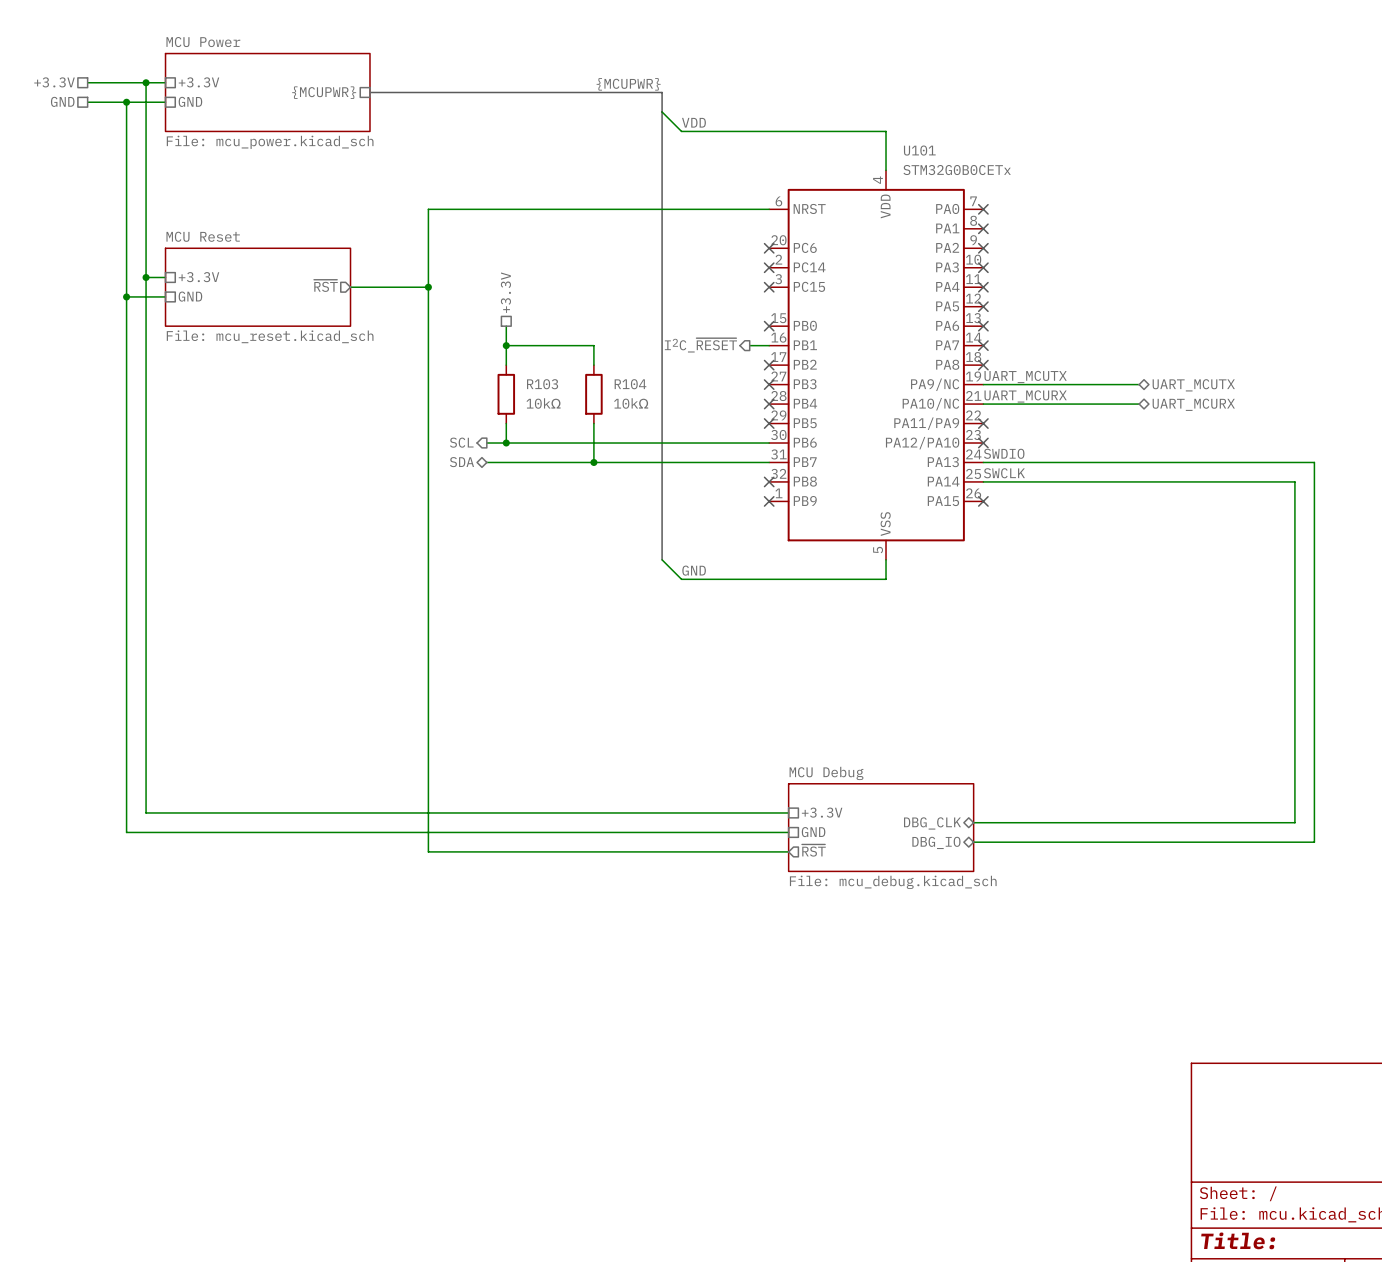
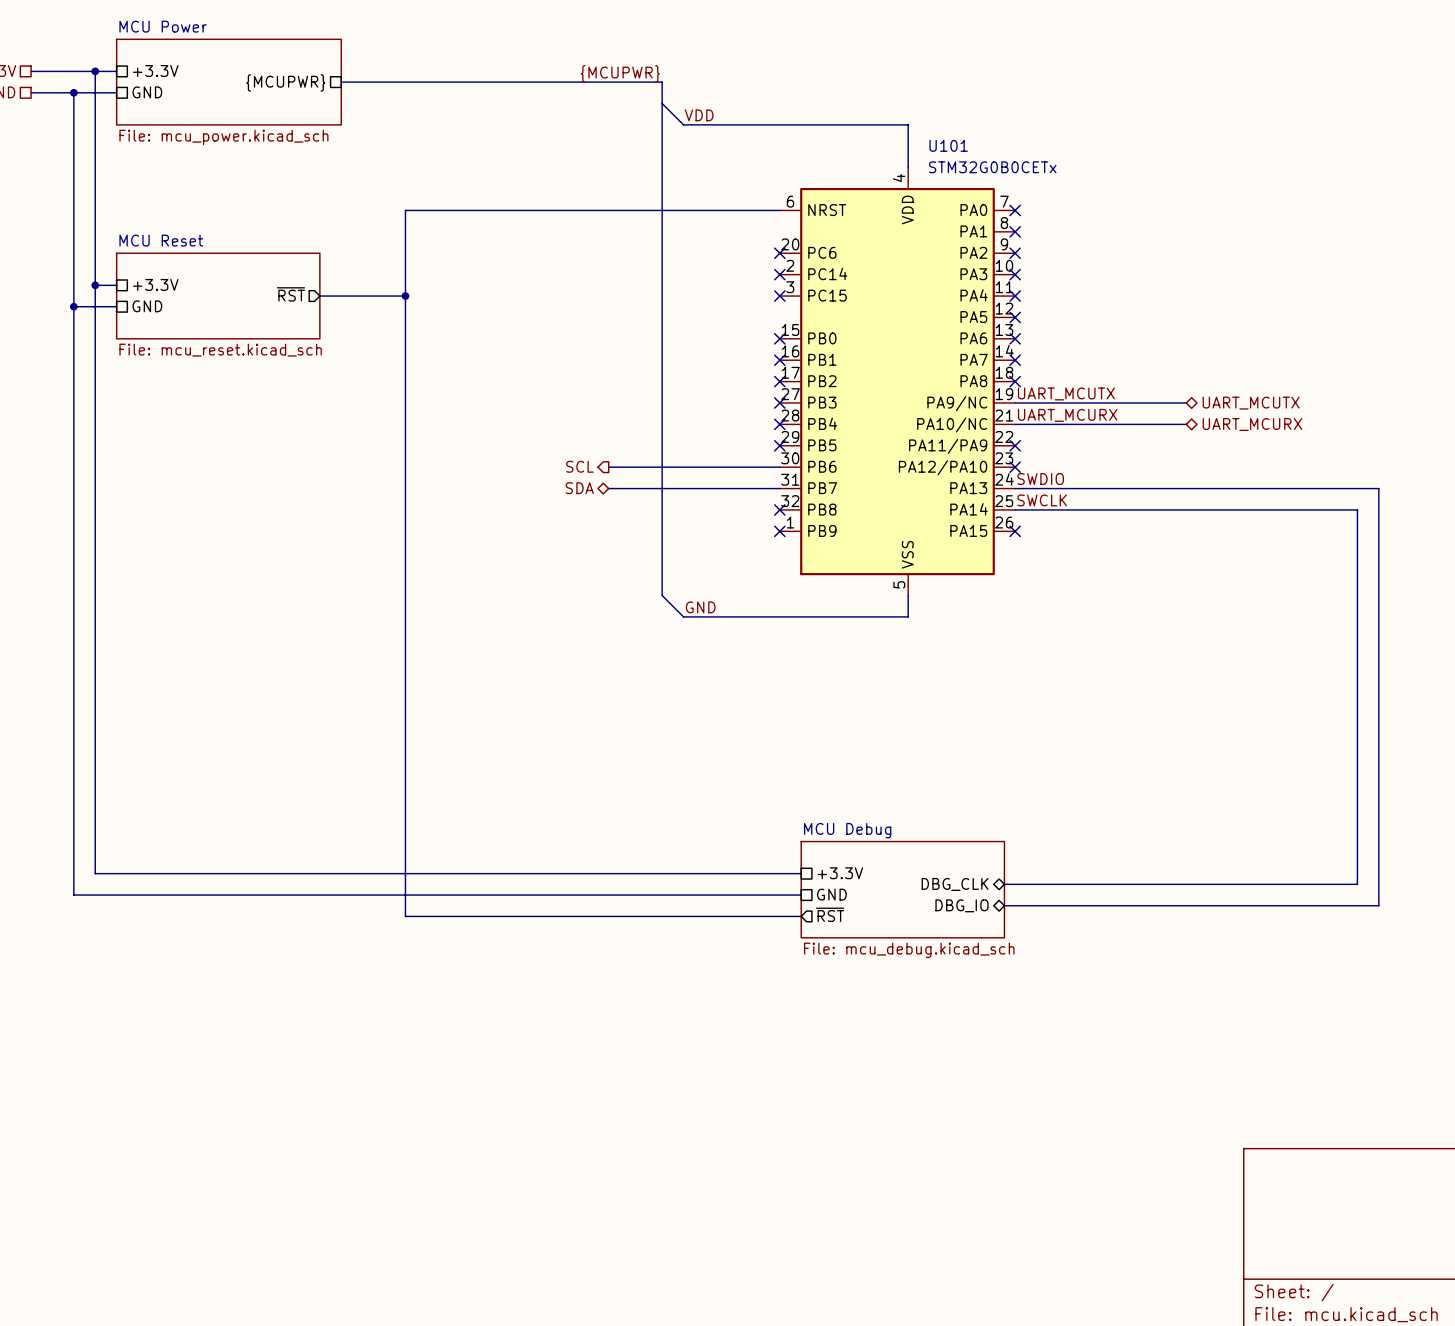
hierarchical label: +3.3V (505, 292) -> none
wire: (506, 326) (506, 365) -> none
wire: (506, 345) (593, 345) (593, 365) -> none
junction: (506, 345) -> none
hierarchical label: I2C_~{RESET} (700, 345) -> none
wire: (749, 345) (769, 345) -> none
no-connect mark: none -> (779, 360)
R103: 10kΩ (506, 394) -> none
R104: 10kΩ (593, 394) -> none
wire: (506, 423) (506, 443) -> none
wire: (593, 423) (593, 462) -> none
hierarchical label position: SCL (461, 442) -> SCL (579, 466)
wire: (486, 443) (613, 443) -> none
junction: (506, 443) -> none
hierarchical label position: SDA (462, 462) -> SDA (579, 488)
wire: (486, 462) (613, 462) -> none
junction: (593, 462) -> none

